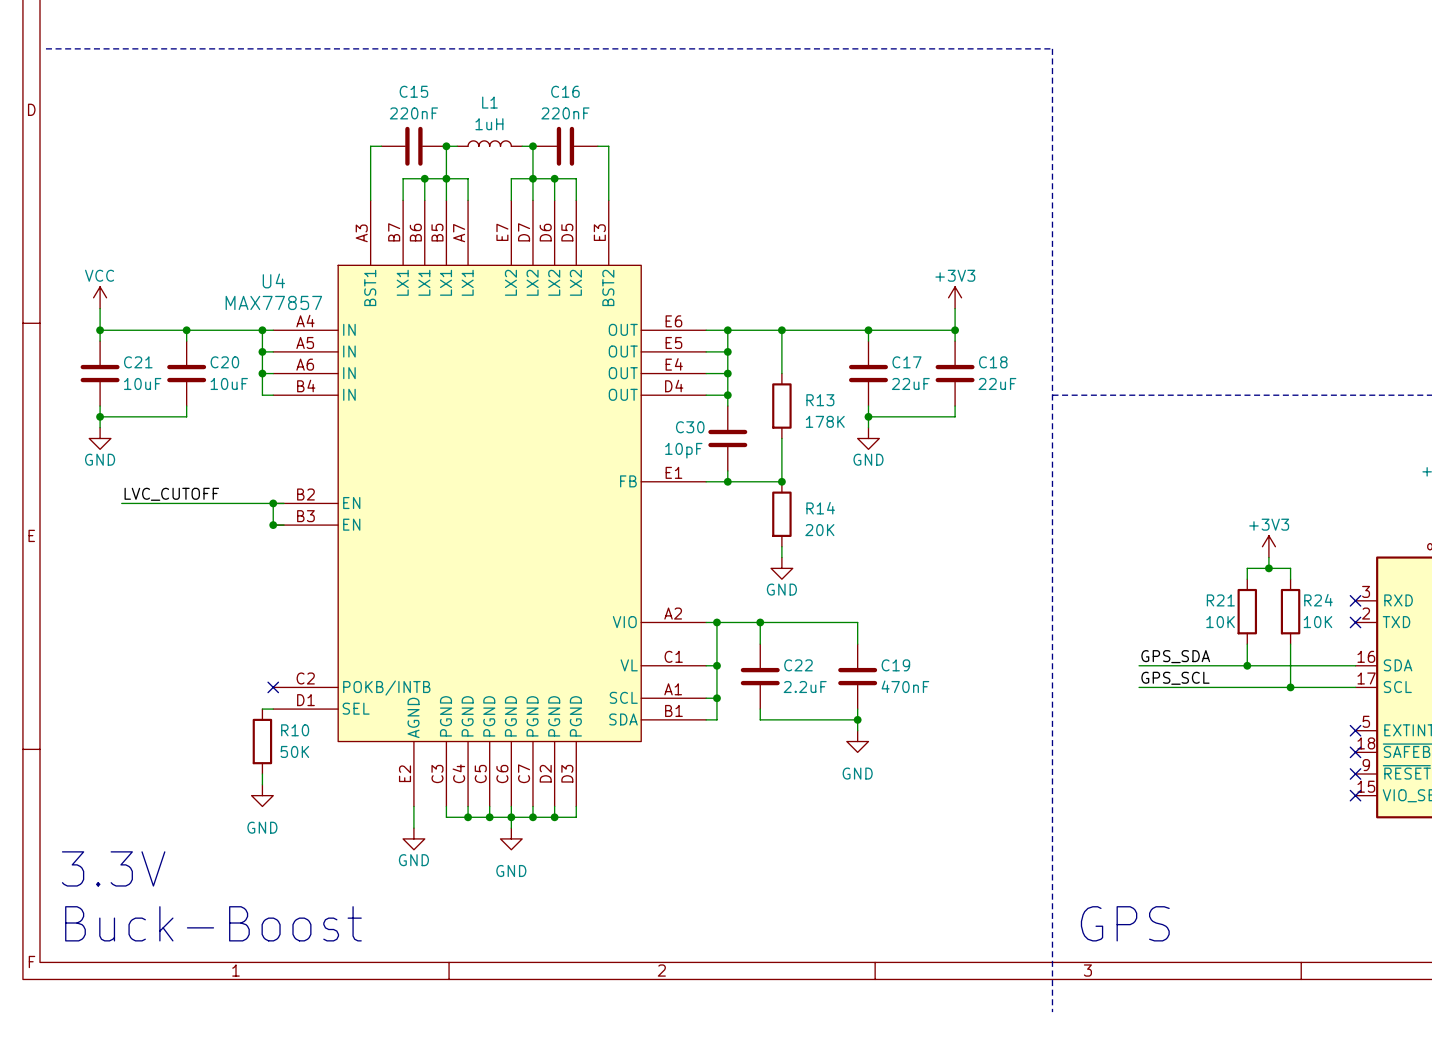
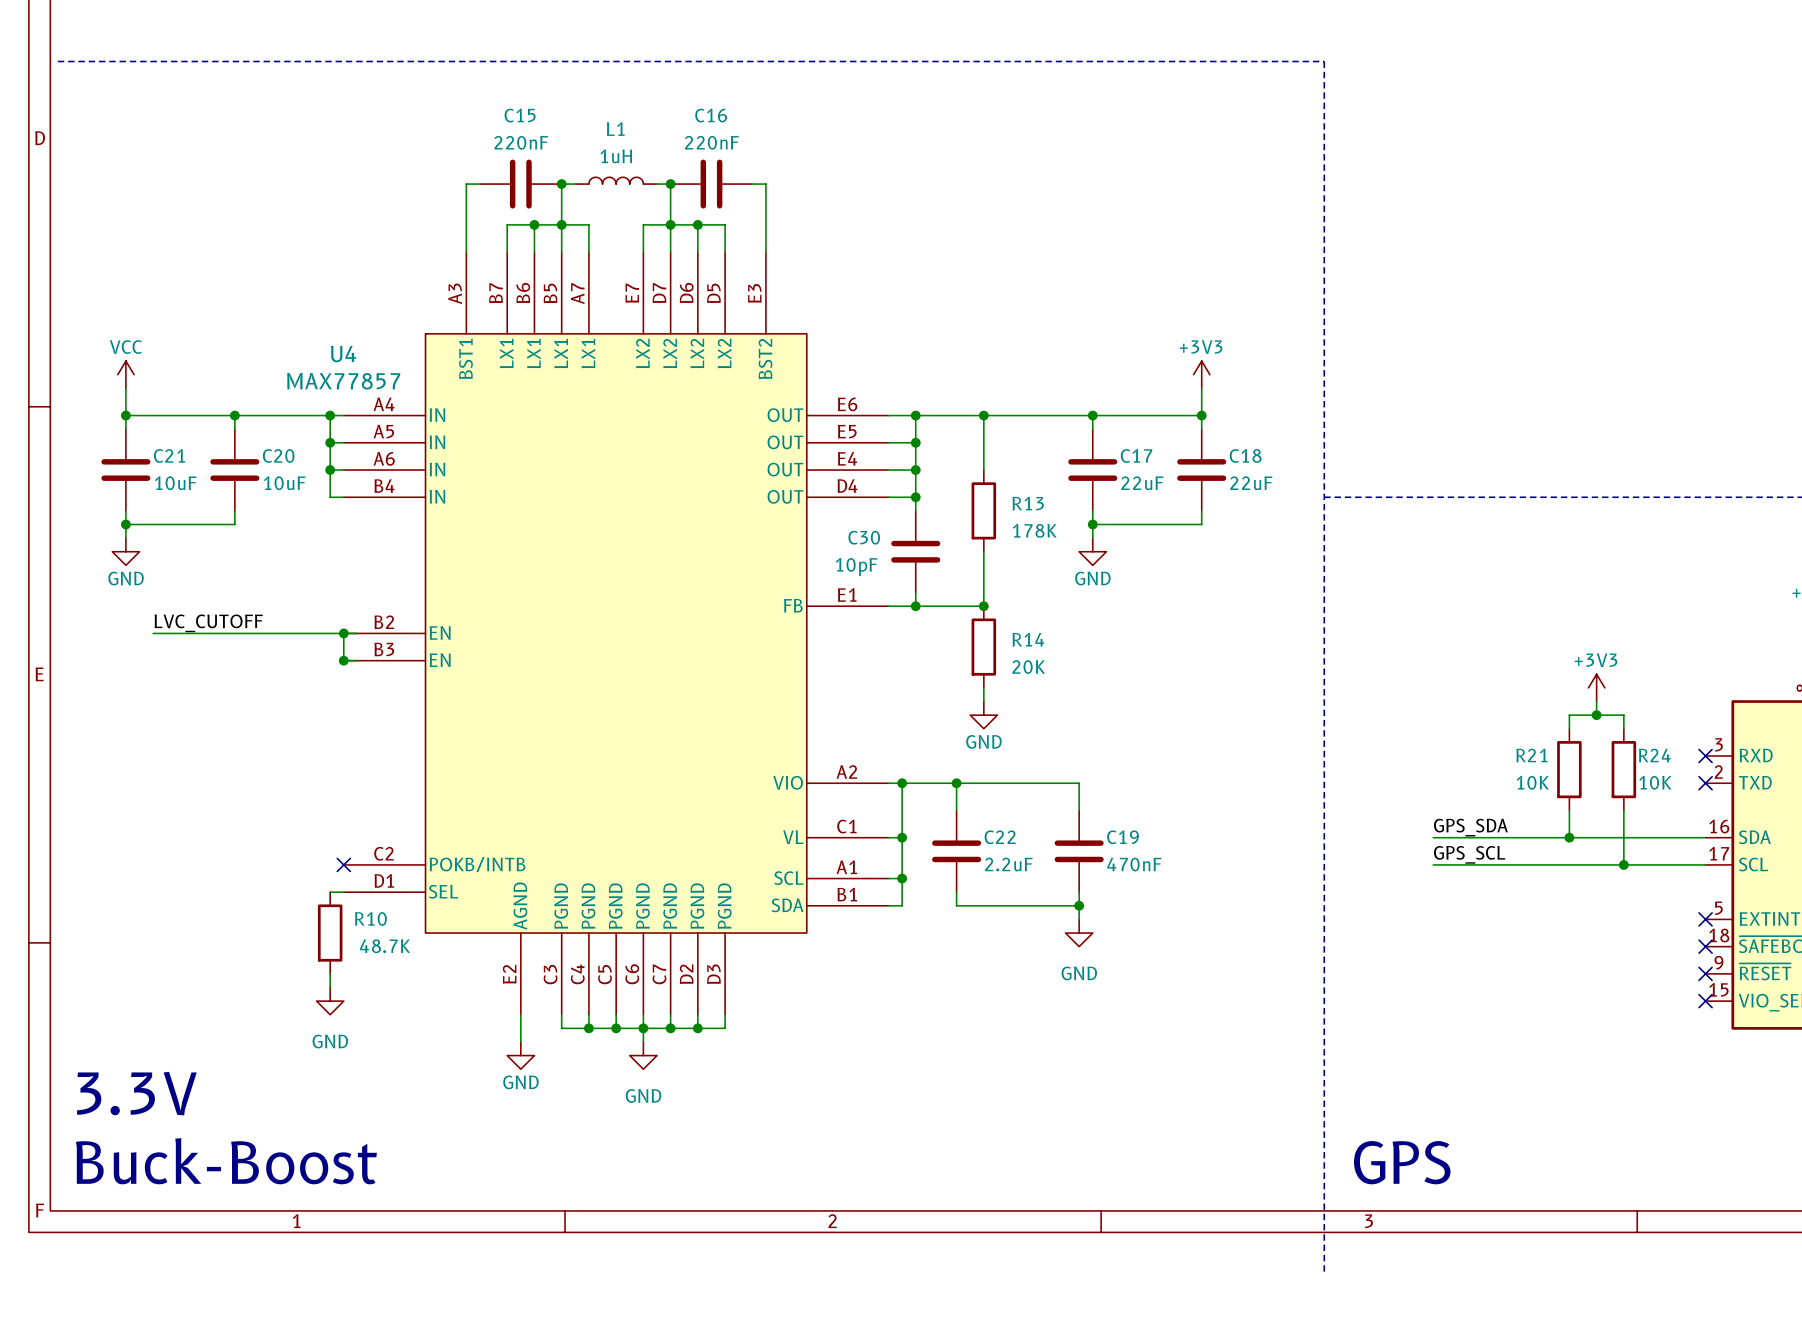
R10 value: 50K (294, 751) -> 48.7K (385, 946)

